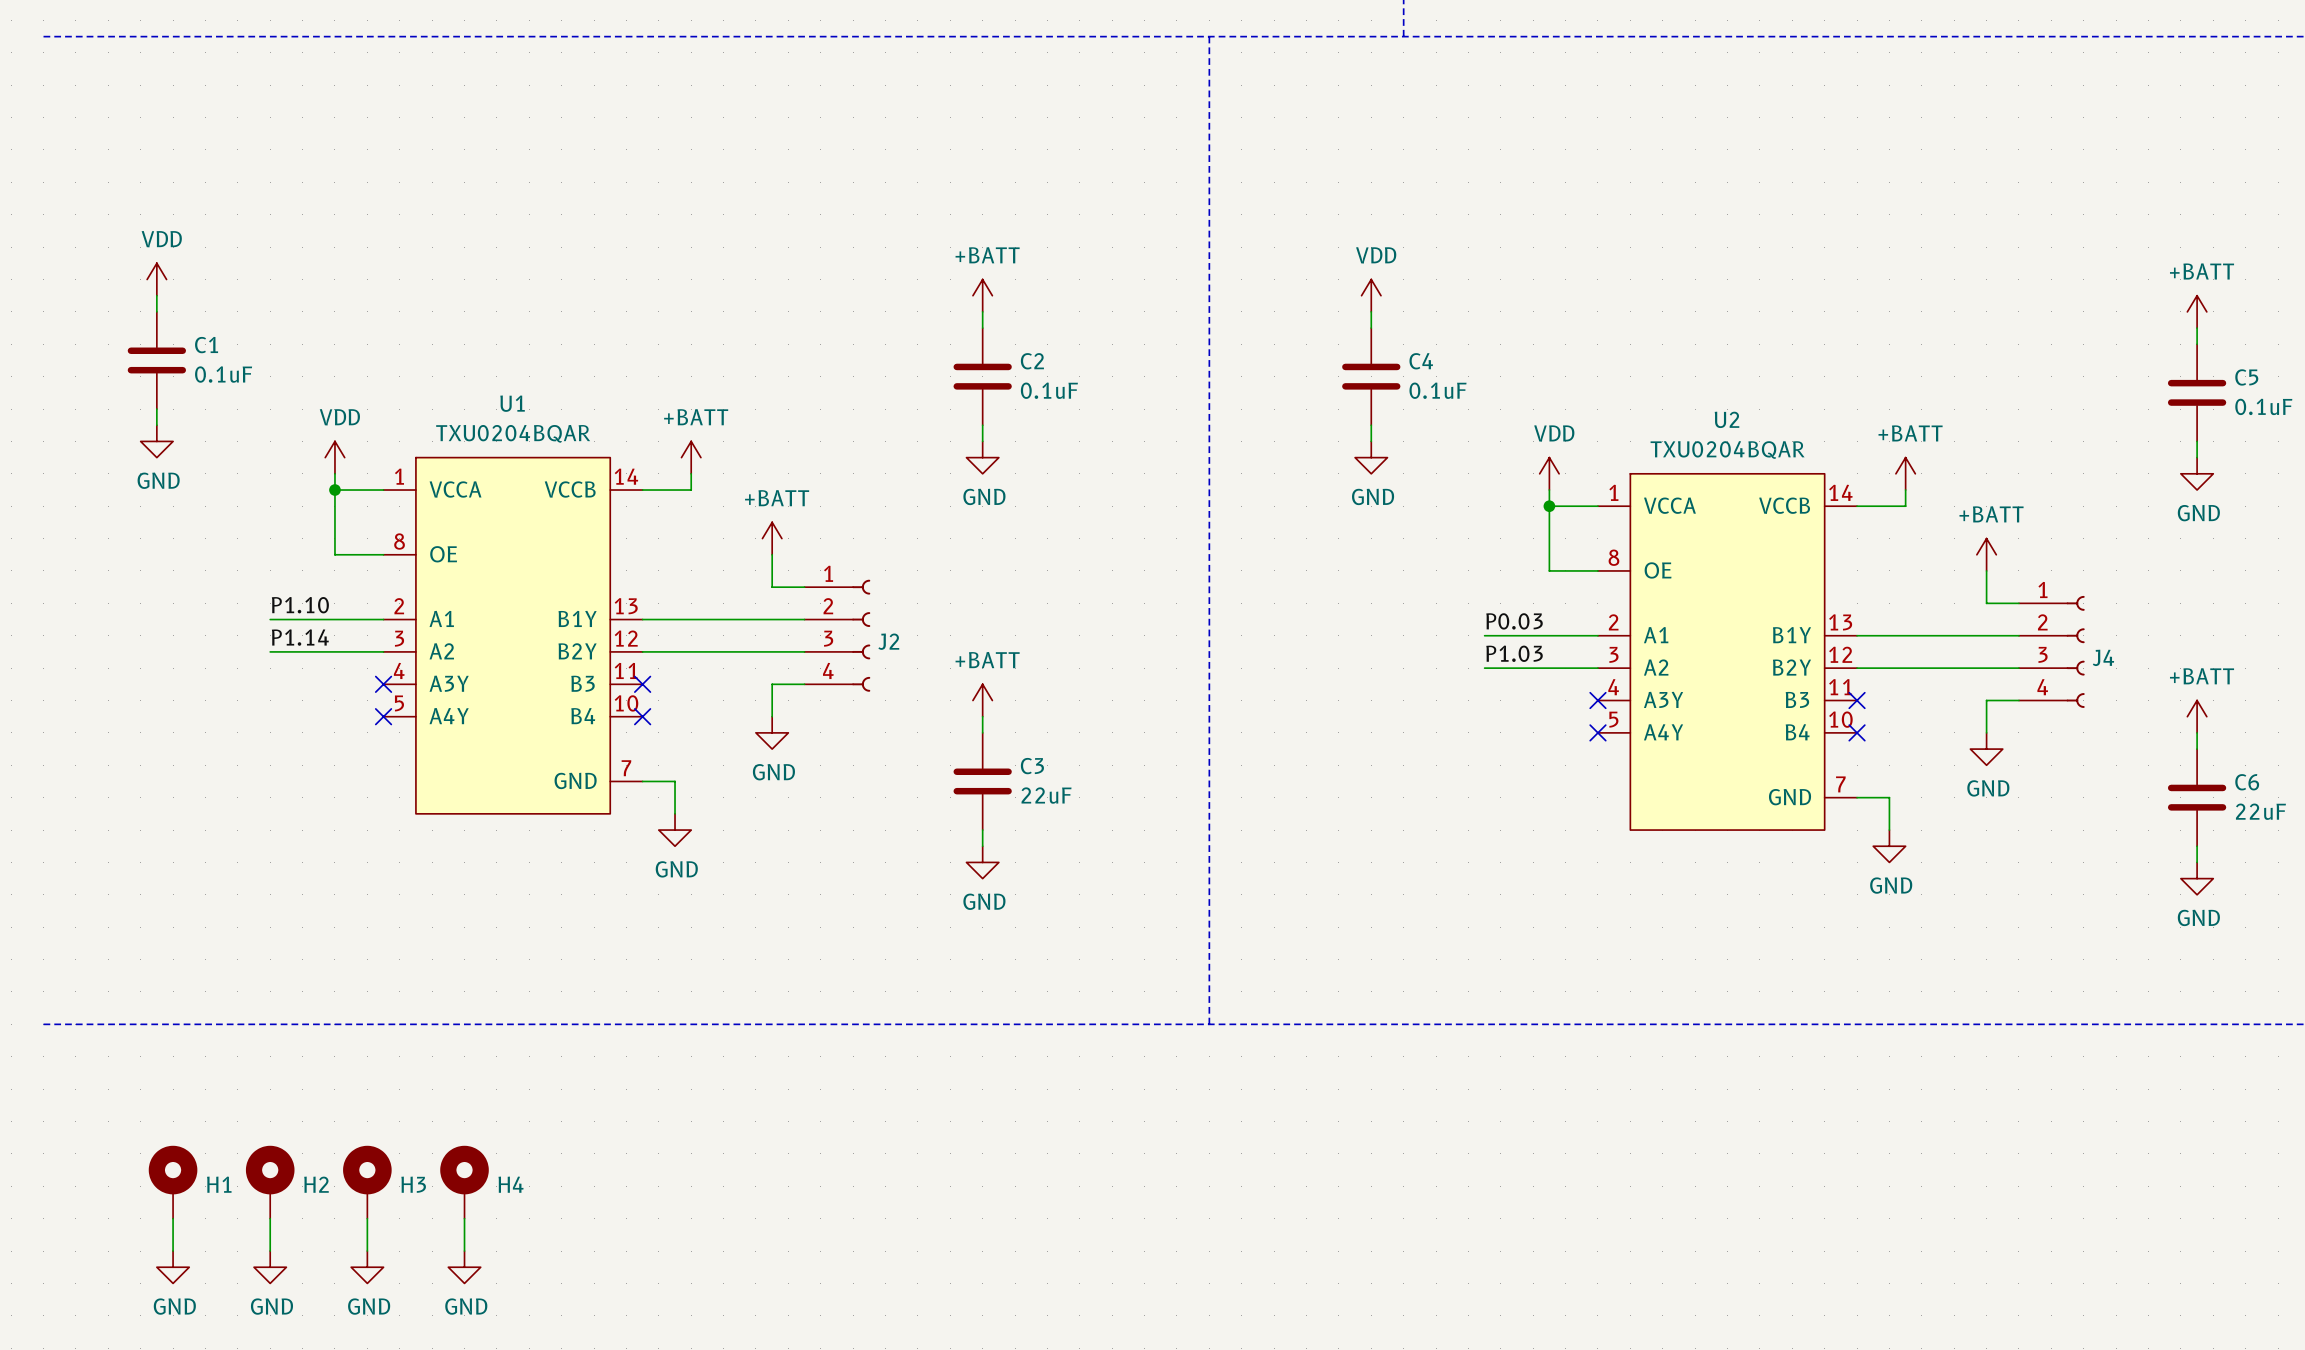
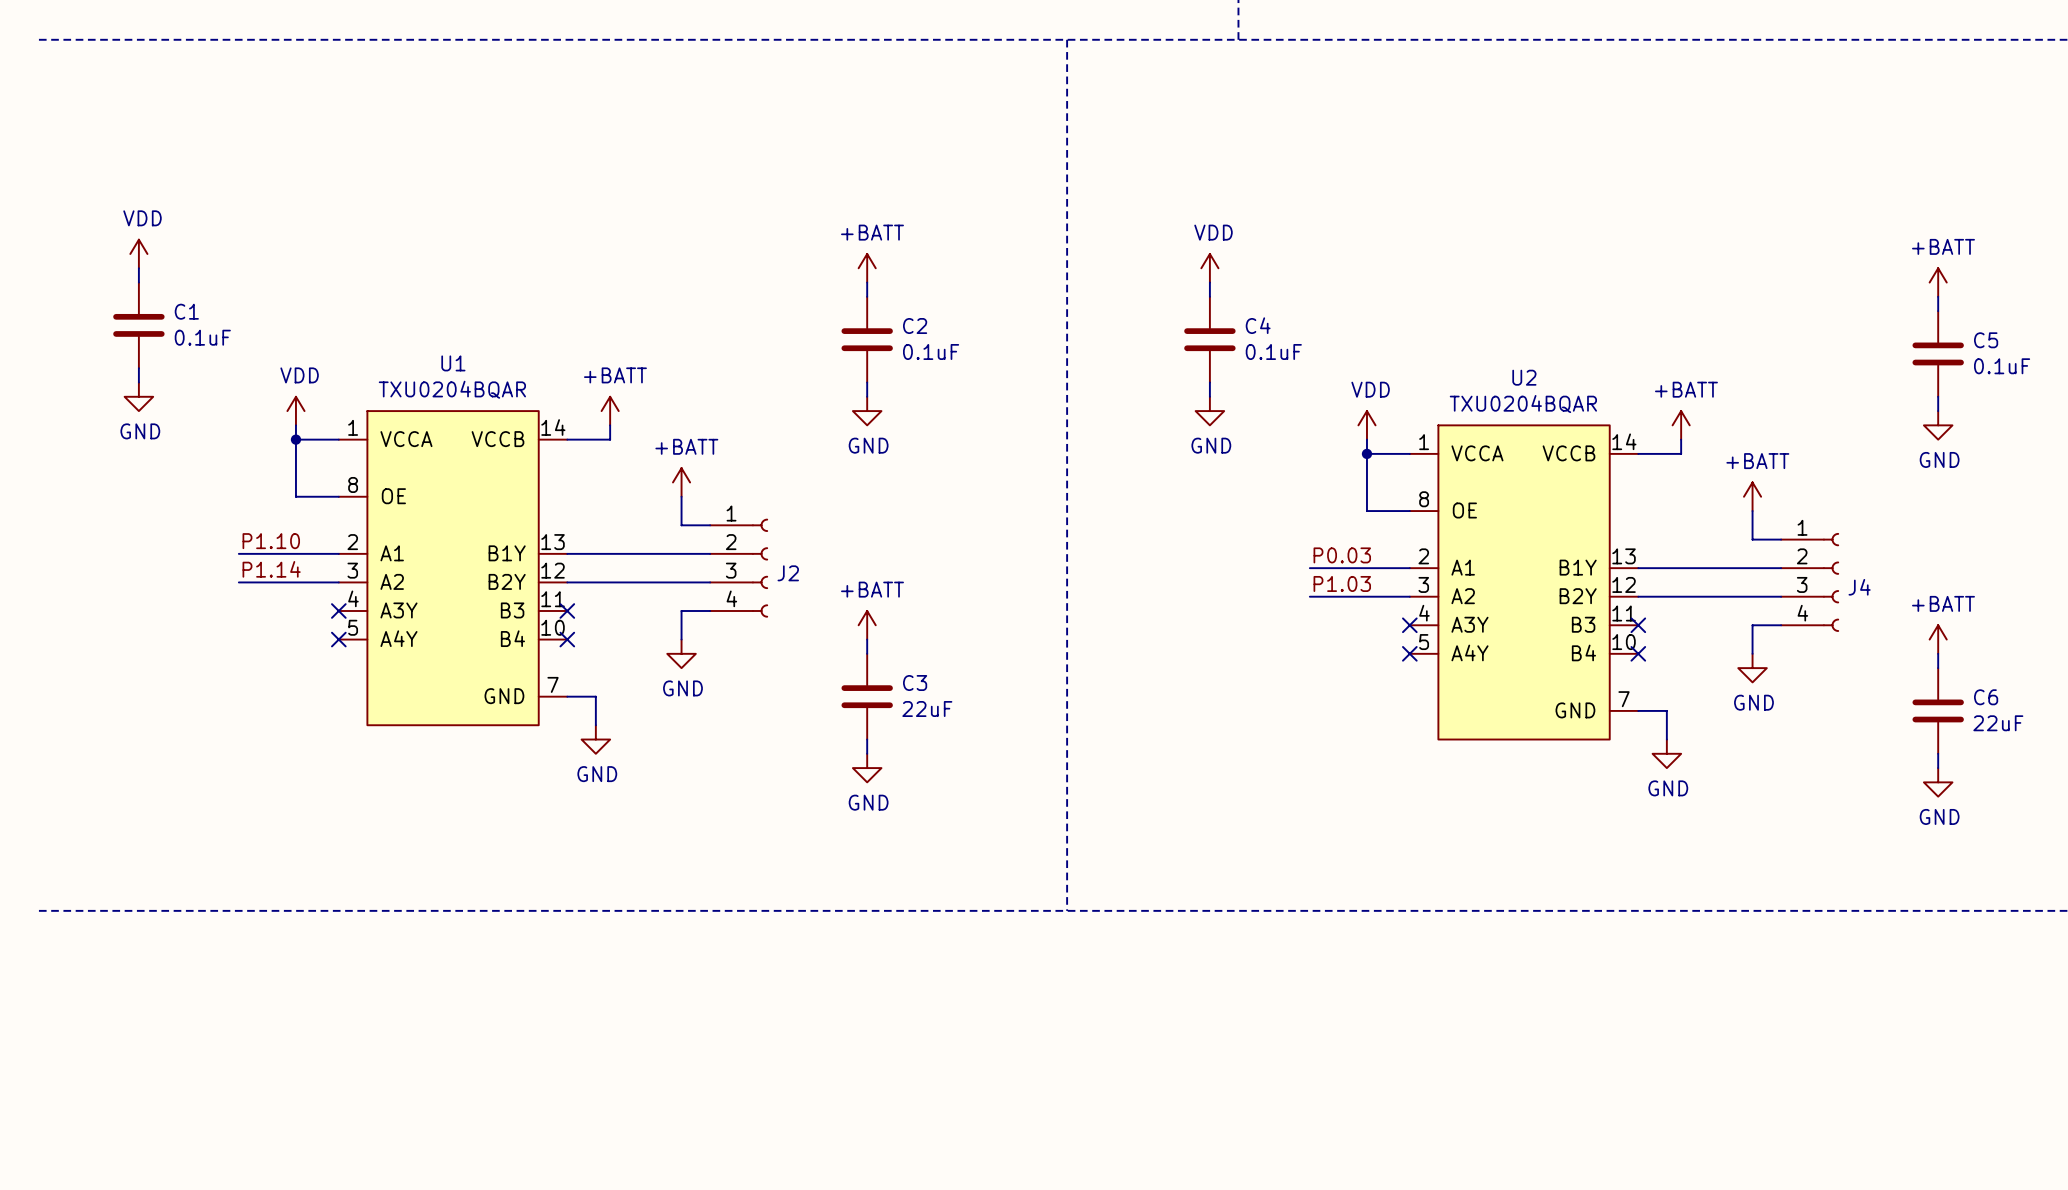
H1: (173, 1182) -> none
H2: (270, 1182) -> none
H3: (367, 1182) -> none
H4: (464, 1182) -> none
wire: (173, 1218) (173, 1251) -> none
wire: (270, 1218) (270, 1251) -> none
wire: (367, 1218) (367, 1251) -> none
wire: (464, 1218) (464, 1251) -> none
power symbol: GND (173, 1267) -> none
power symbol: GND (270, 1267) -> none
power symbol: GND (367, 1267) -> none
power symbol: GND (464, 1267) -> none

